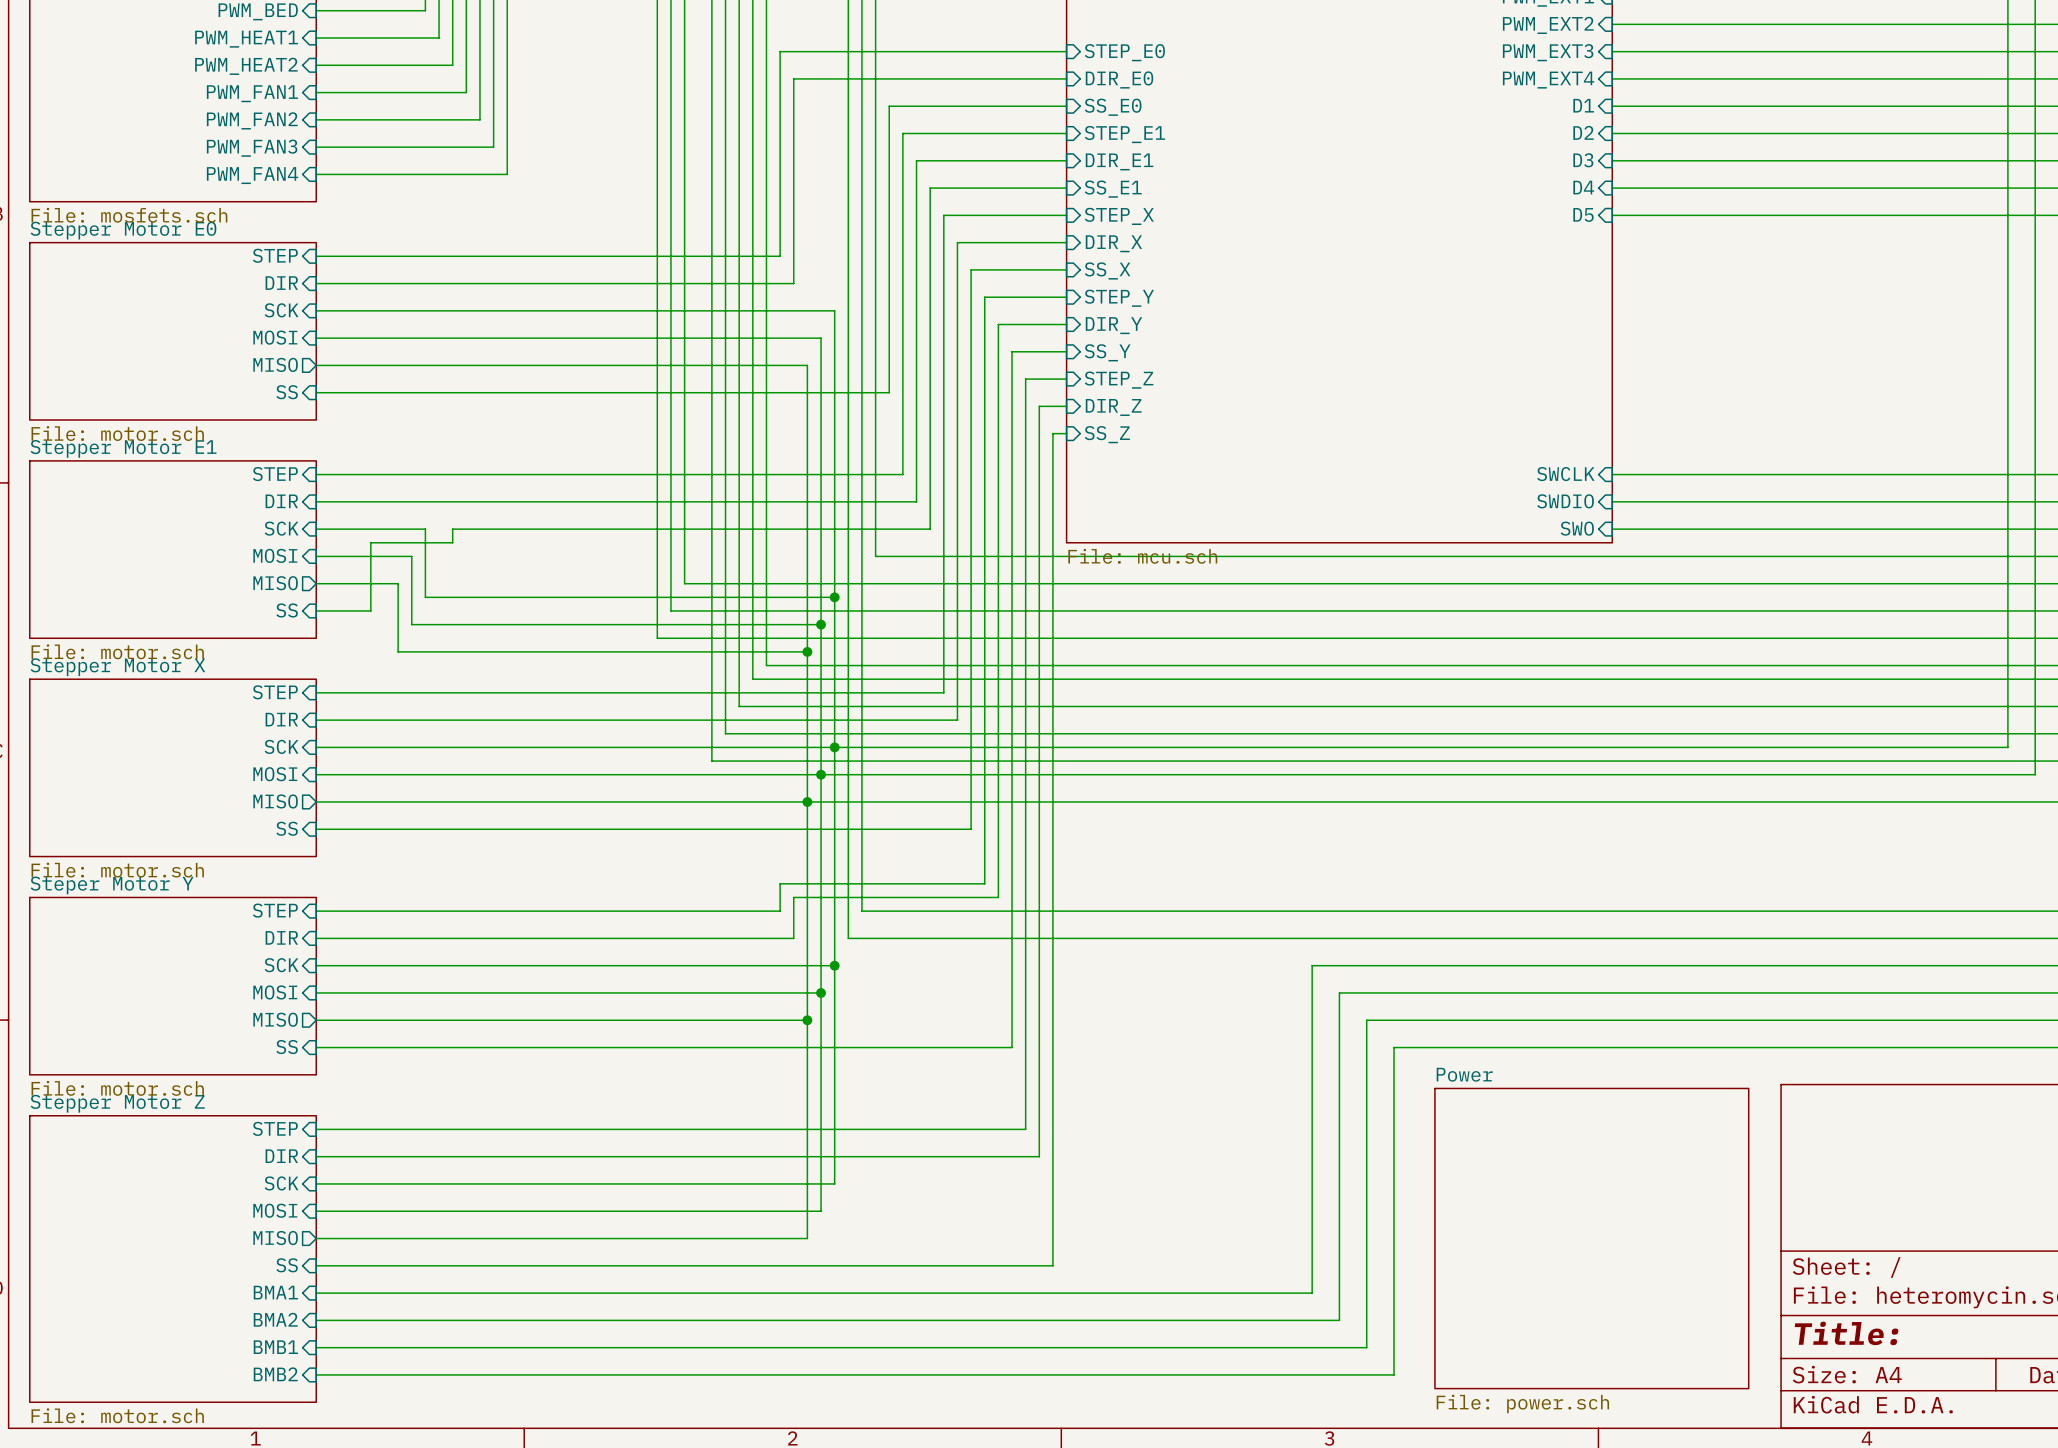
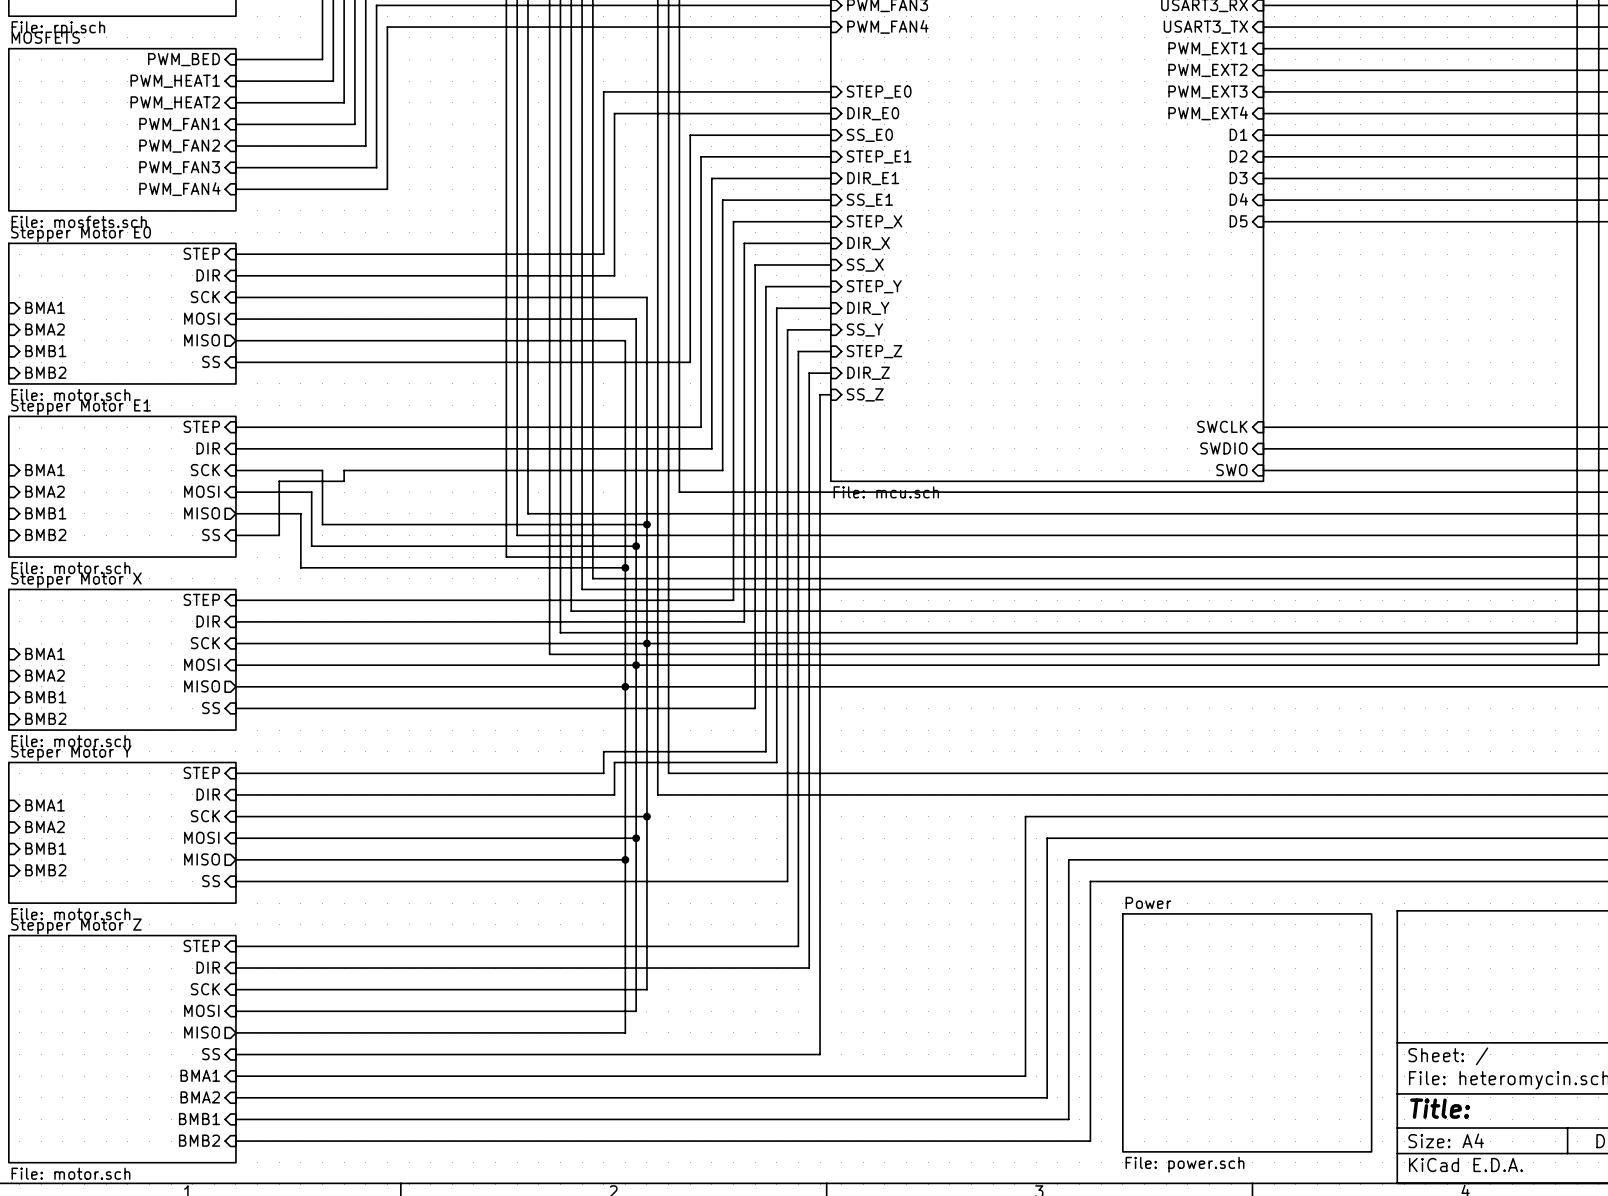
sheet pin: none -> BMA1 (45, 307)
sheet pin: none -> BMA2 (45, 329)
sheet pin: none -> BMB1 (45, 351)
sheet pin: none -> BMB2 (45, 372)
sheet pin: none -> BMA1 (45, 470)
sheet pin: none -> BMA2 (45, 491)
sheet pin: none -> BMB1 (45, 513)
sheet pin: none -> BMB2 (45, 534)
sheet pin: none -> BMA1 (45, 653)
sheet pin: none -> BMA2 (45, 675)
sheet pin: none -> BMB1 (45, 697)
sheet pin: none -> BMB2 (45, 718)
sheet pin: none -> BMA1 (45, 805)
sheet pin: none -> BMA2 (45, 827)
sheet pin: none -> BMB1 (45, 848)
sheet pin: none -> BMB2 (45, 870)

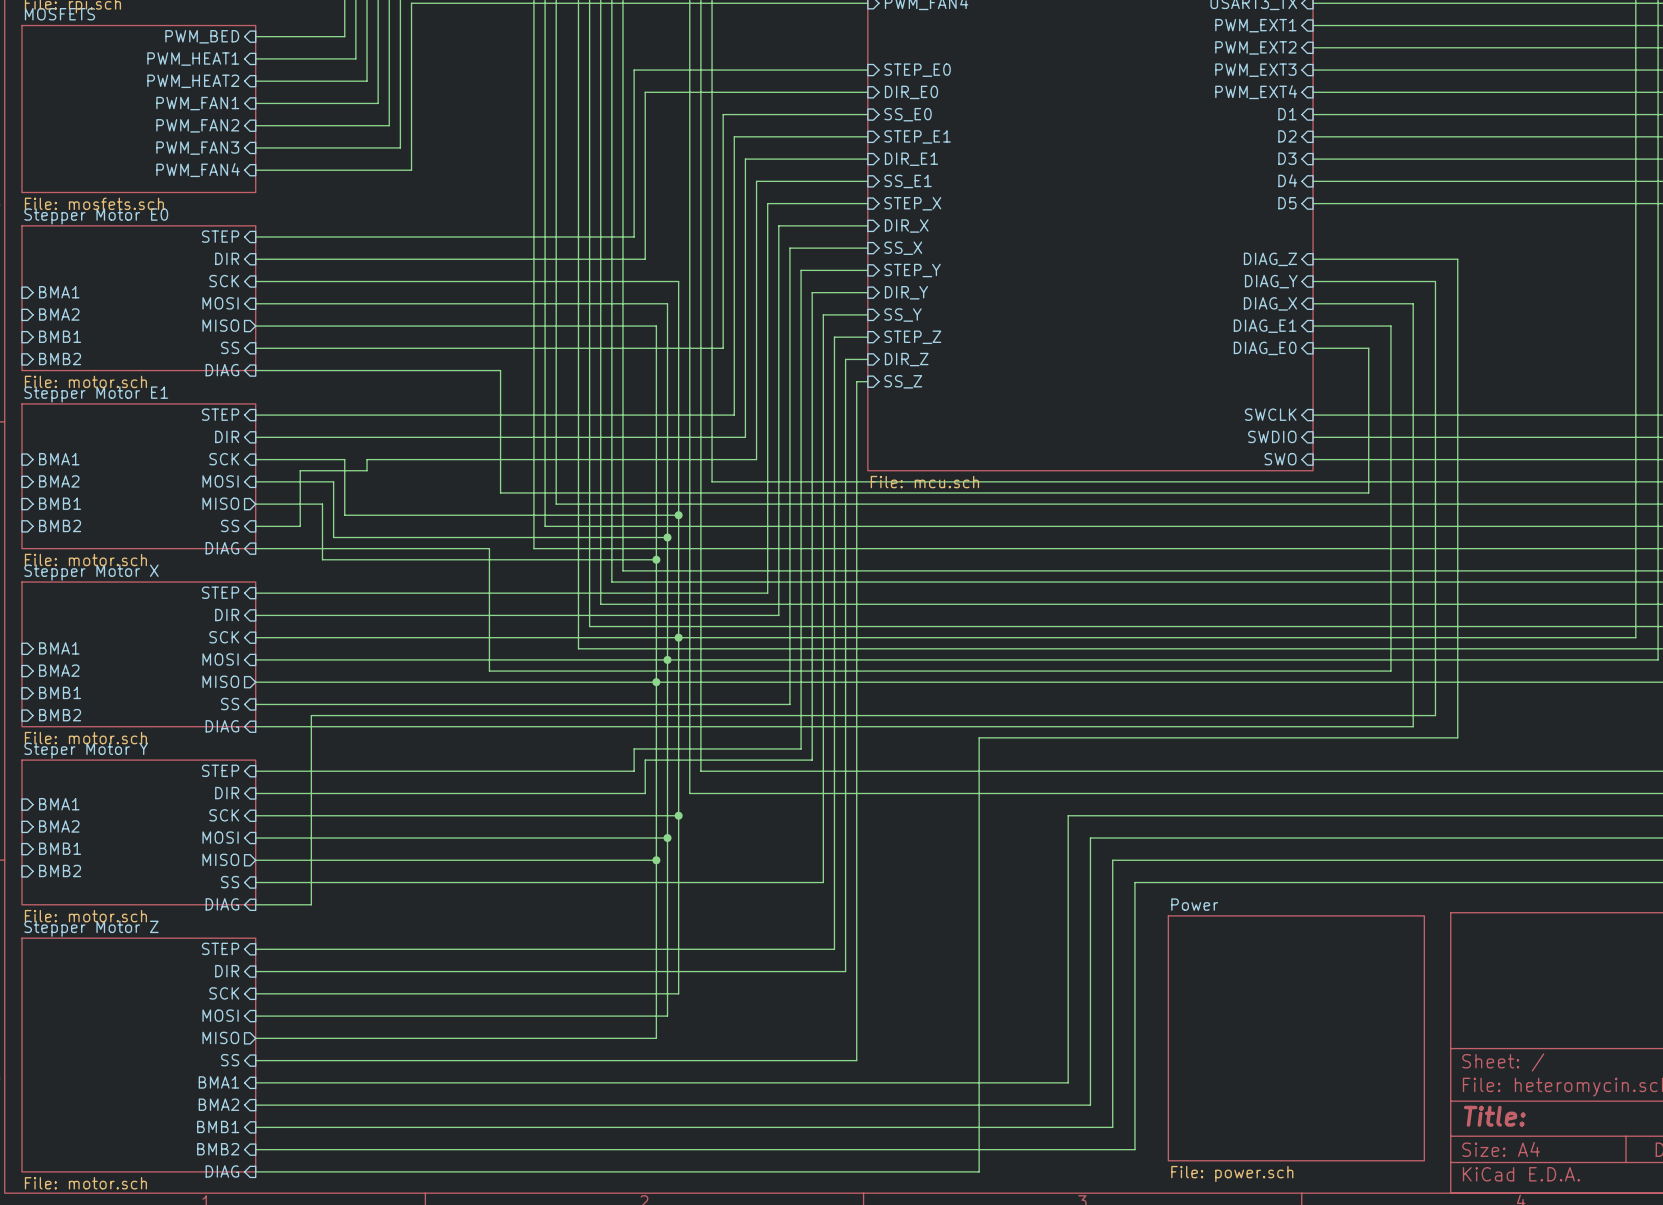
sheet pin: none -> DIAG_Z (1270, 259)
wire: none -> (1313, 259) (1457, 259) (1457, 737) (979, 737) (979, 1171) (255, 1171)
sheet pin: none -> DIAG_Y (1271, 281)
wire: none -> (1313, 281) (1435, 281) (1435, 715) (311, 715) (311, 904) (255, 904)
sheet pin: none -> DIAG_X (1270, 303)
wire: none -> (1313, 303) (1413, 303) (1413, 726) (255, 726)
sheet pin: none -> DIAG_E1 (1265, 326)
wire: none -> (1313, 326) (1390, 326) (1390, 671) (489, 671) (489, 548) (255, 548)
sheet pin: none -> DIAG_E0 (1265, 348)
wire: none -> (1313, 348) (1368, 348) (1368, 492) (500, 492) (500, 370) (255, 370)
sheet pin: none -> DIAG (222, 370)
sheet pin: none -> DIAG (222, 548)
sheet pin: none -> DIAG (222, 726)
sheet pin: none -> DIAG (222, 904)
sheet pin: none -> DIAG (222, 1171)

